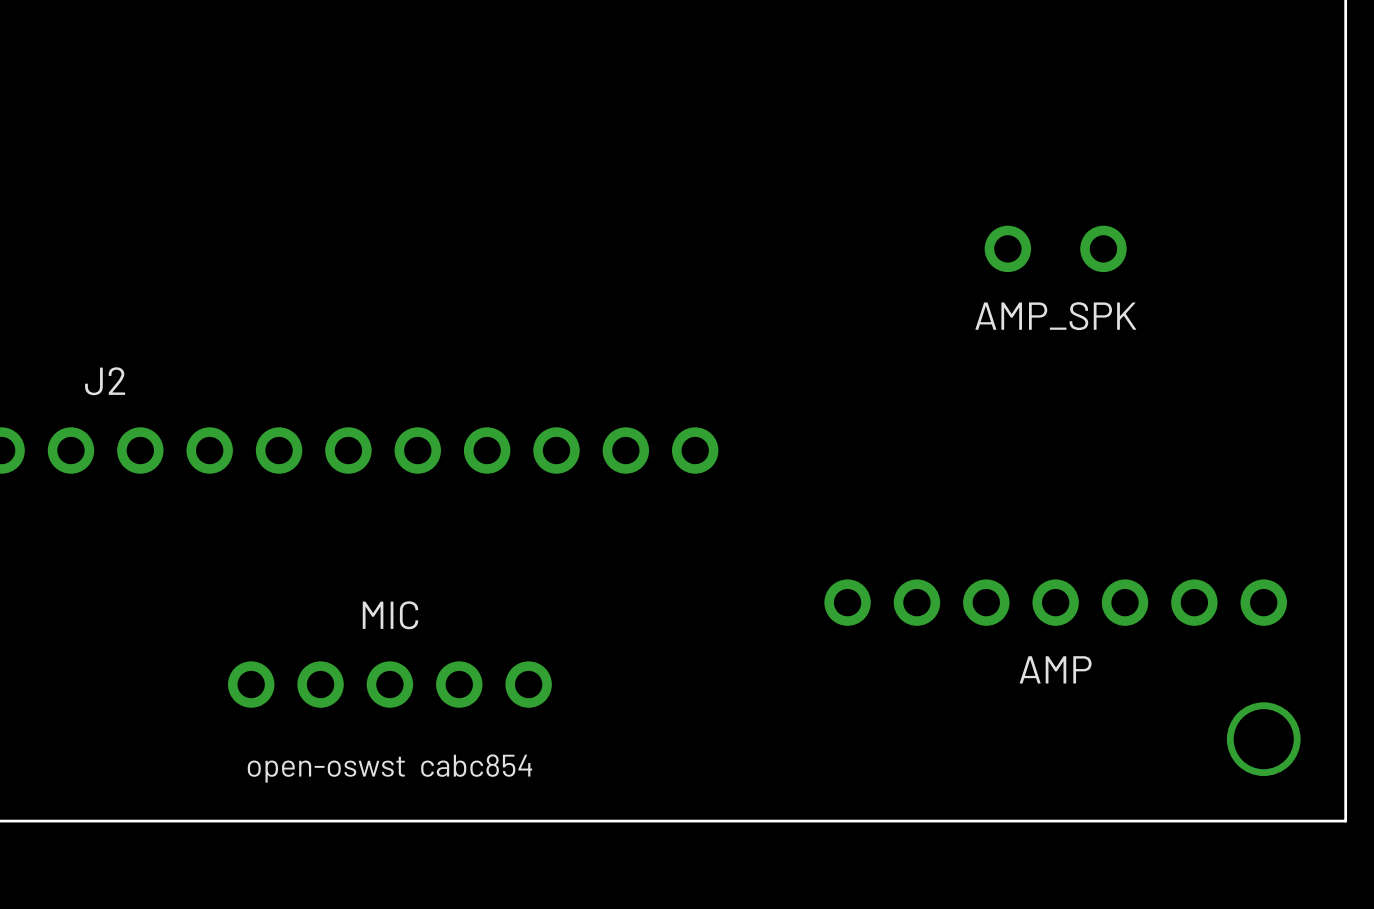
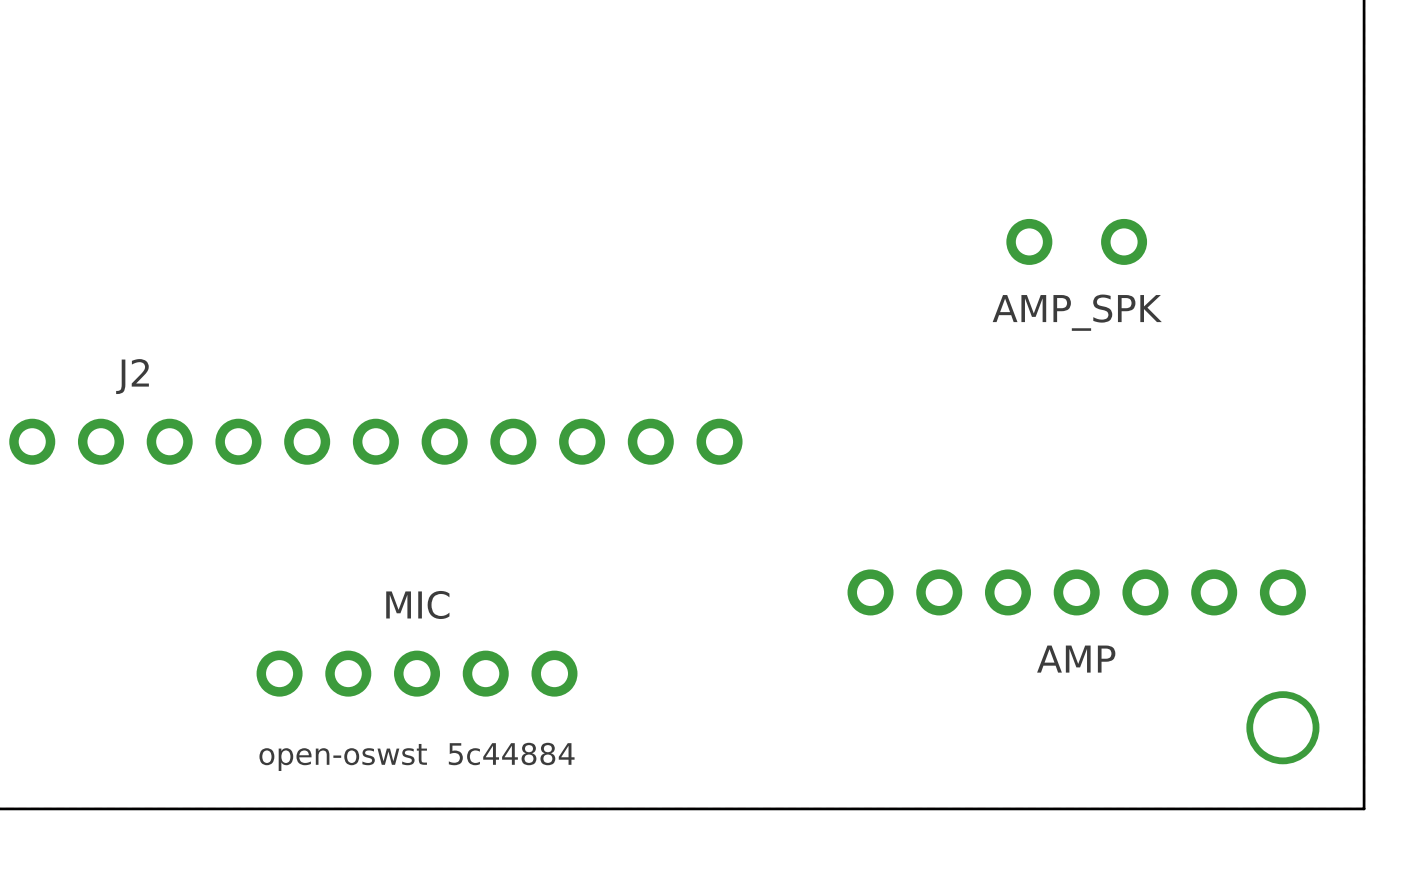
text: open-oswst cabc854 (389, 768) -> open-oswst 5c44884 (417, 756)

